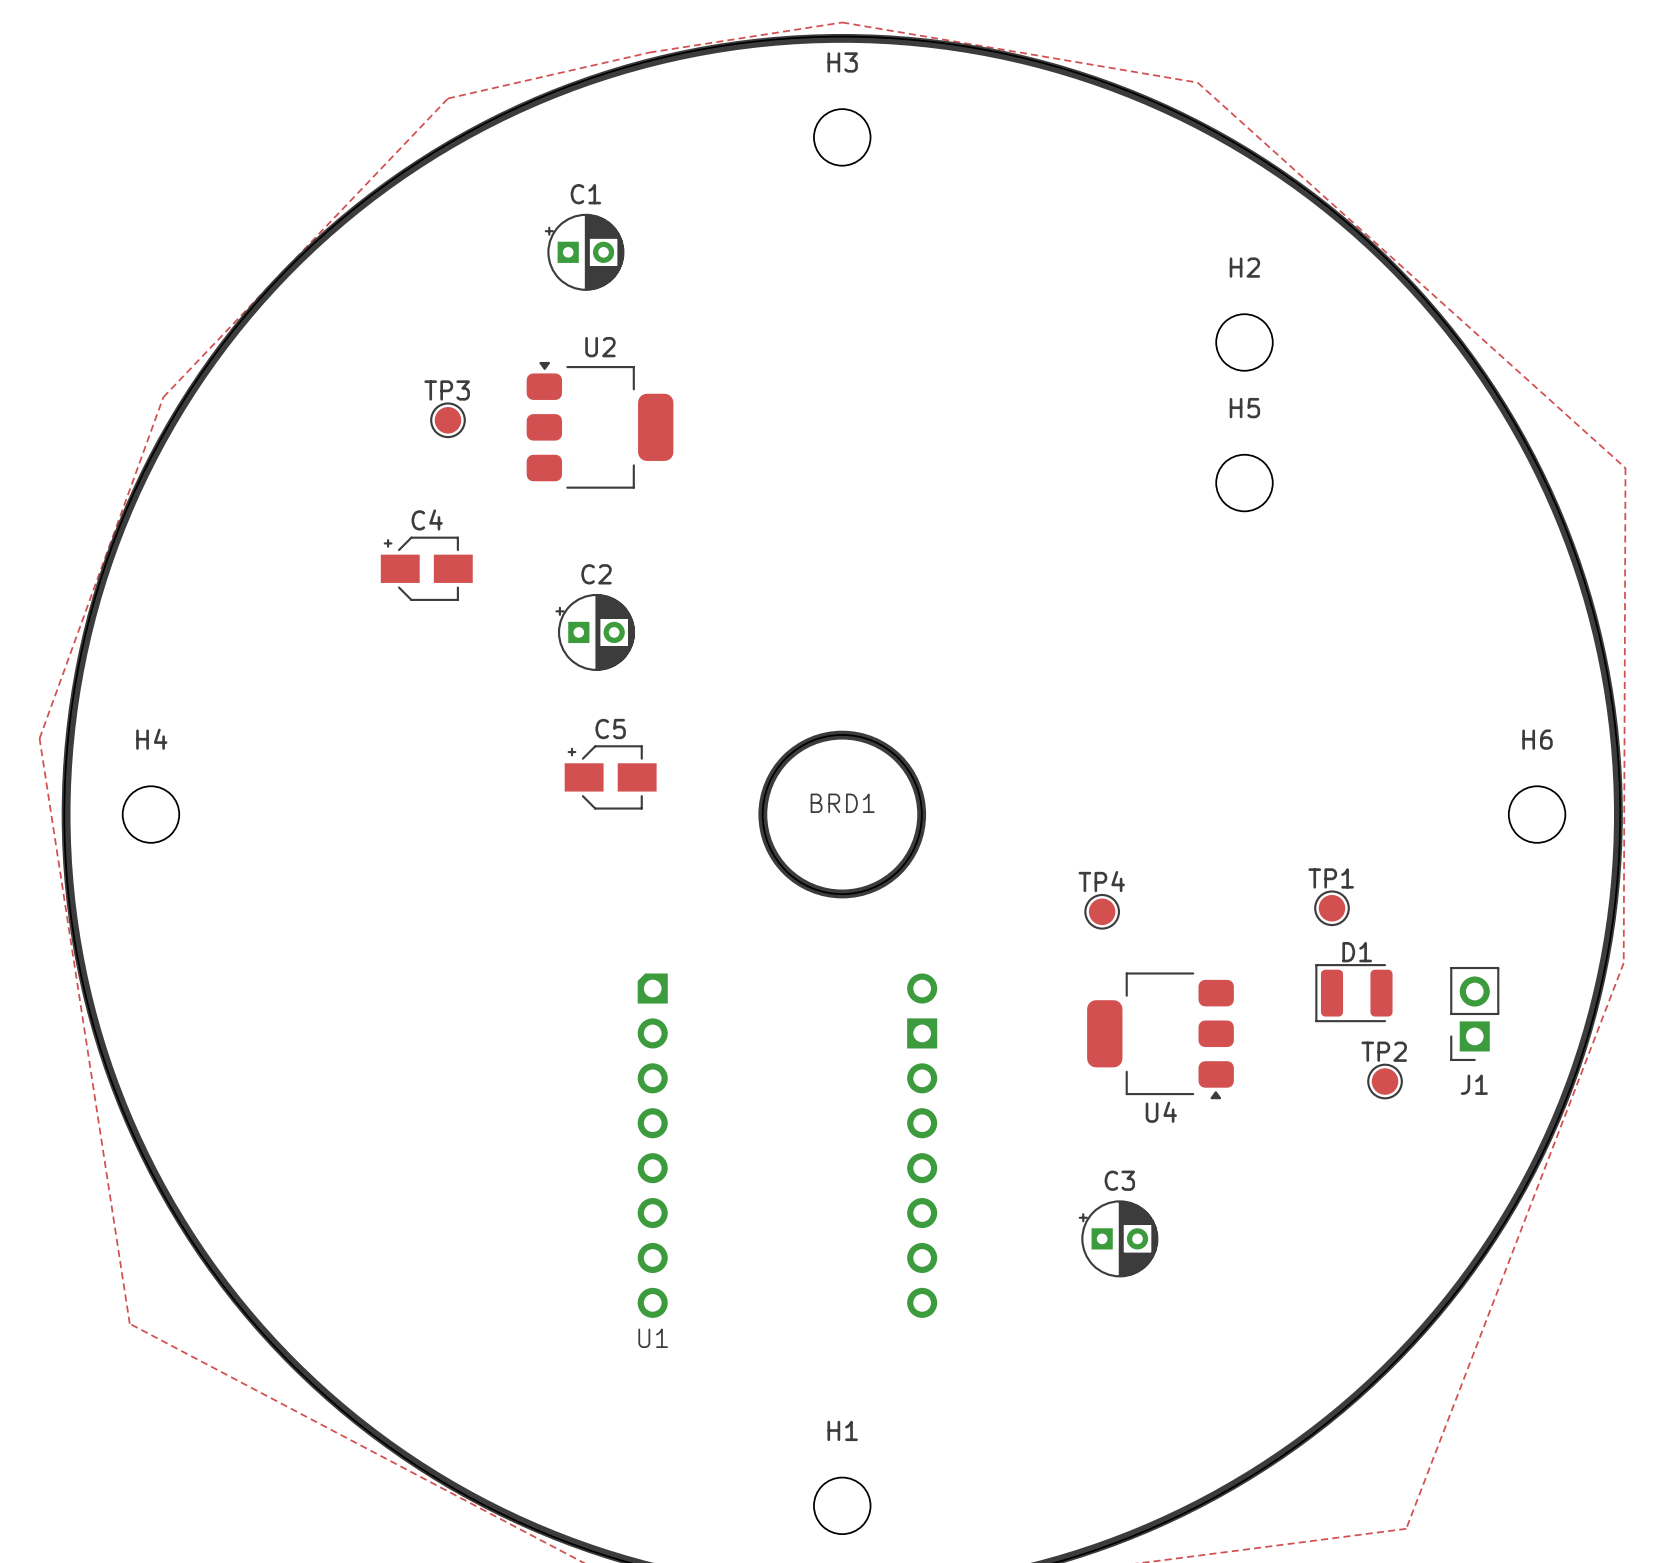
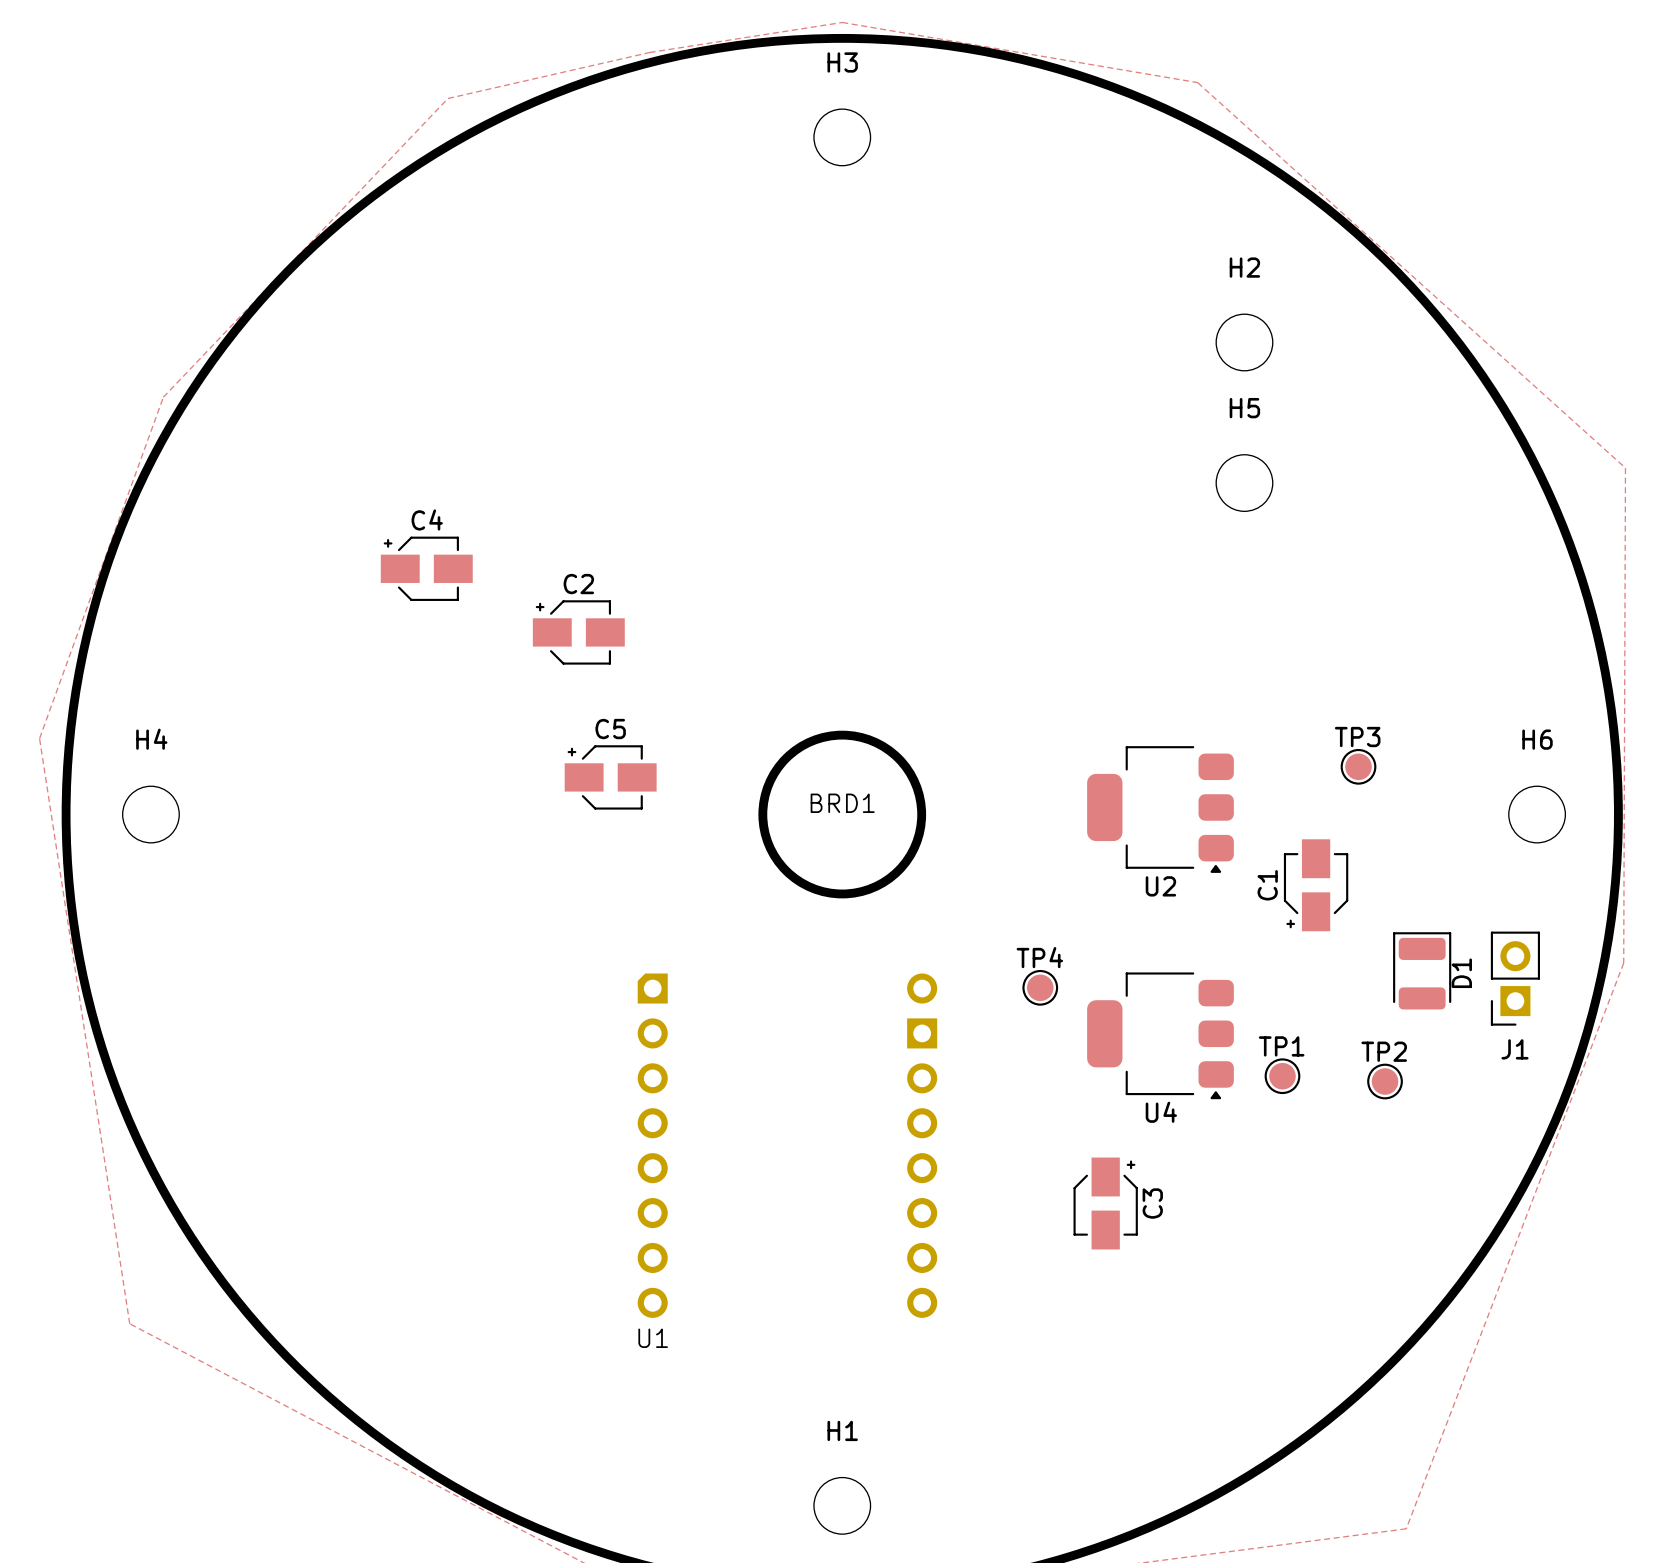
C1 name position: C1 (585, 194) -> C1 (1267, 885)
C1 footprint: [544, 213, 625, 291] -> [1283, 839, 1349, 932]
TP3 position: (447, 420) -> (1358, 766)
U2 rotation: 0° (600, 425) -> 180° (1160, 809)
U2 position: (600, 425) -> (1160, 809)
C2 footprint: [555, 593, 636, 671] -> [532, 600, 625, 665]
TP1 position: (1331, 908) -> (1282, 1076)
TP4 position: (1102, 911) -> (1040, 987)
D1 rotation: 0° (1353, 993) -> 90° clockwise (1422, 970)
D1 position: (1353, 993) -> (1422, 970)
J1 position: (1474, 1013) -> (1515, 978)
C3 name position: C3 (1119, 1180) -> C3 (1152, 1203)
C3 footprint: [1078, 1200, 1159, 1278] -> [1073, 1157, 1138, 1250]

